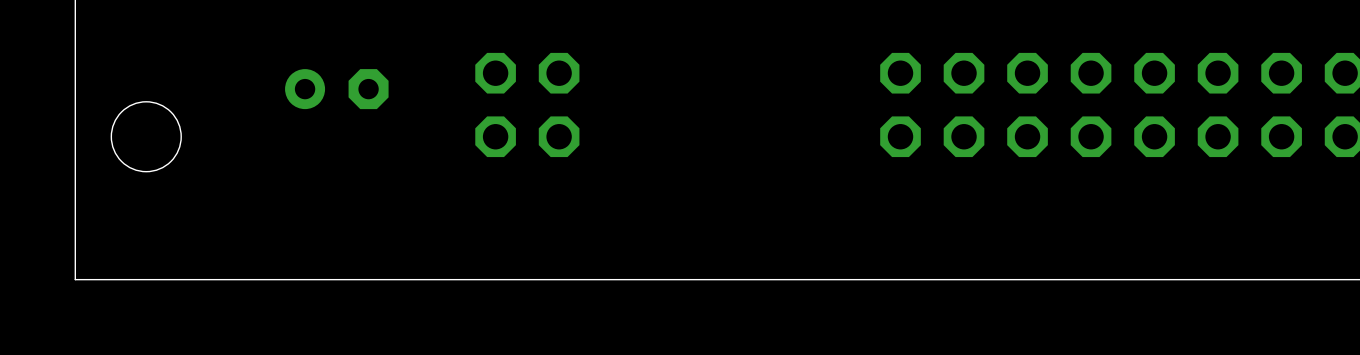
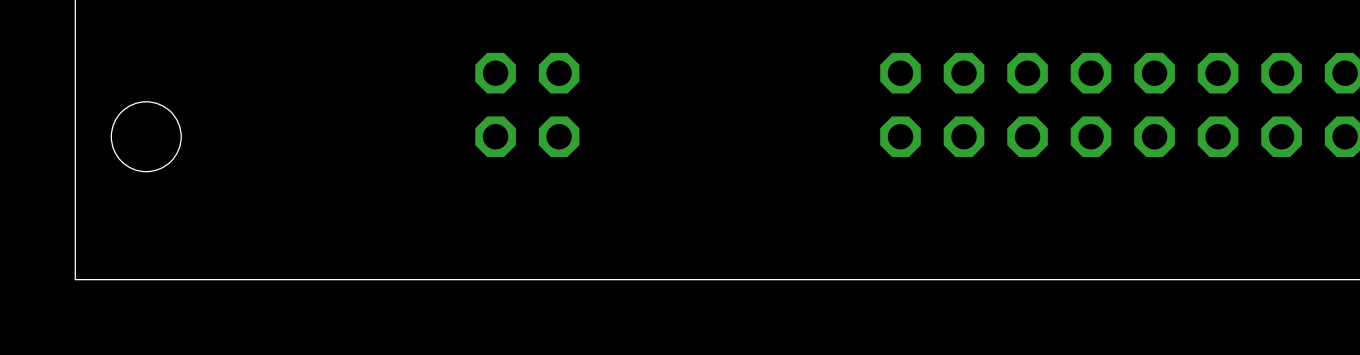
part: (336, 89) -> none

